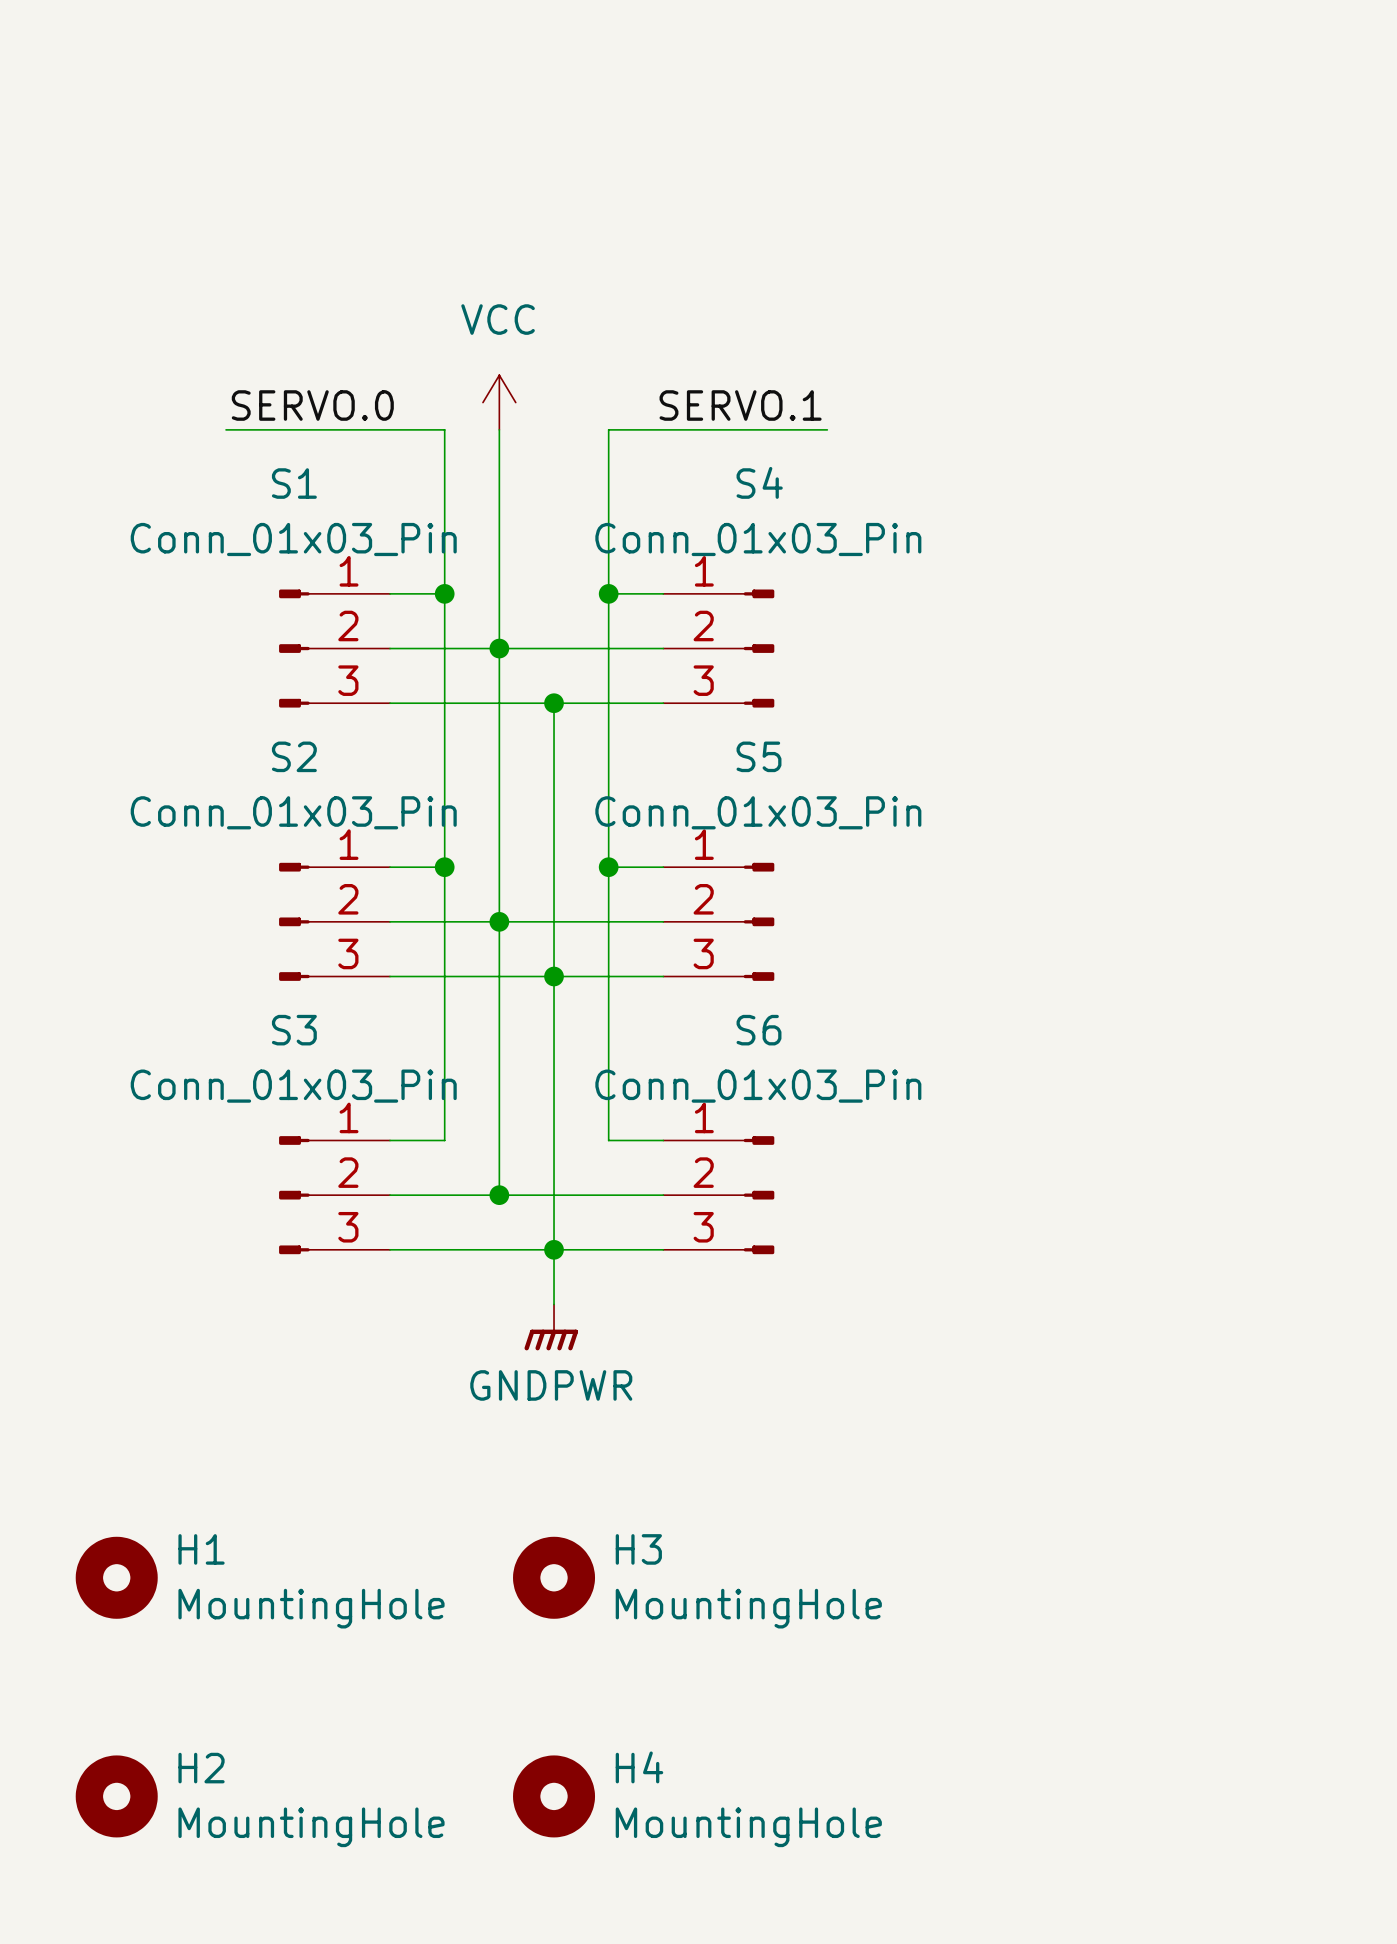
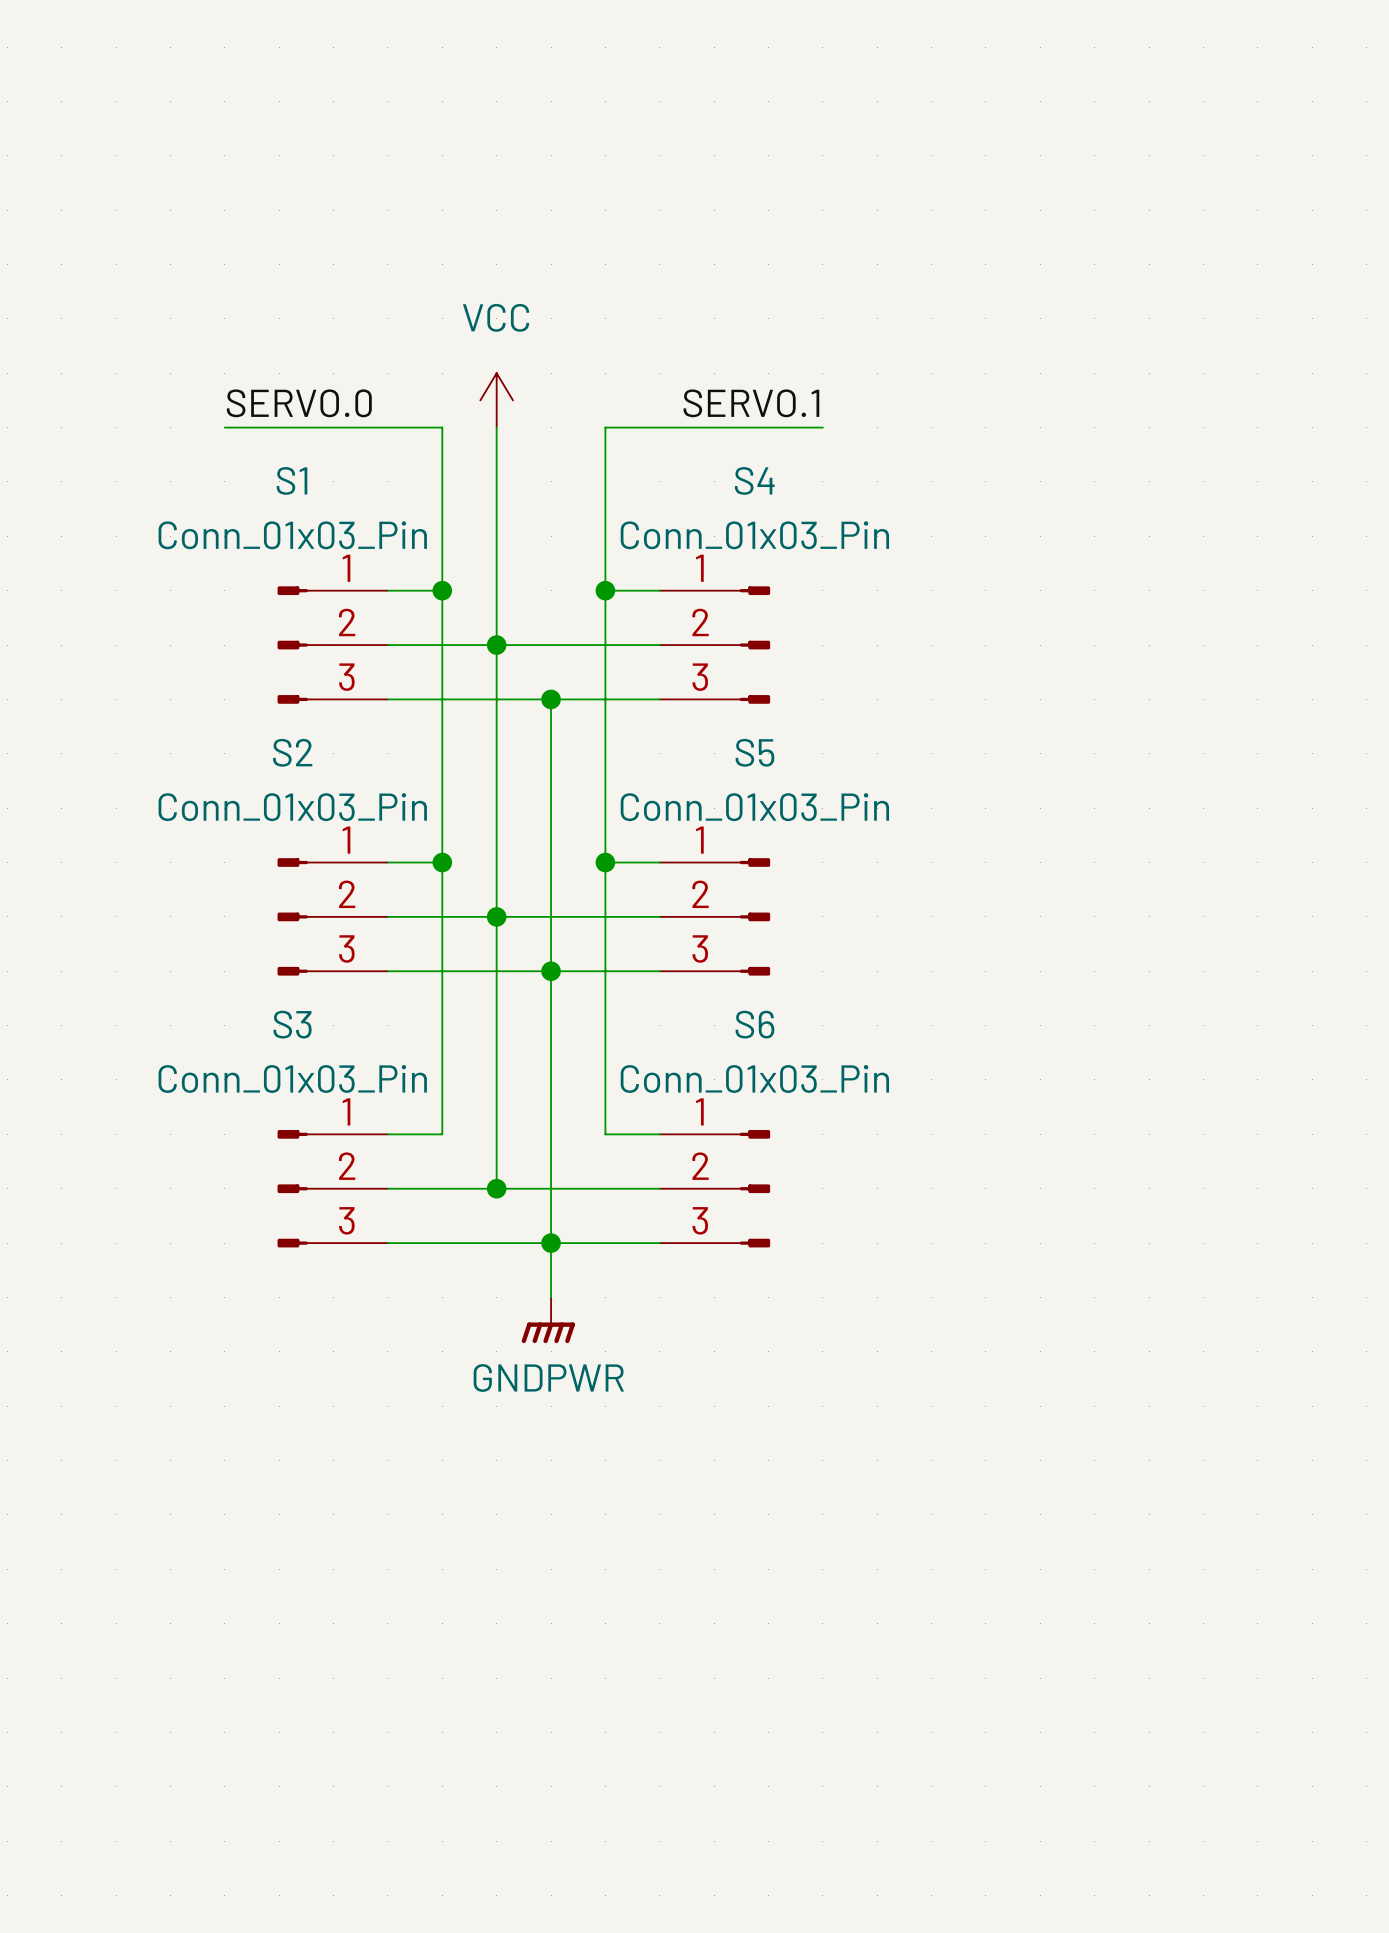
H1: MountingHole (116, 1577) -> none
H3: MountingHole (554, 1577) -> none
H2: MountingHole (116, 1796) -> none
H4: MountingHole (554, 1796) -> none

